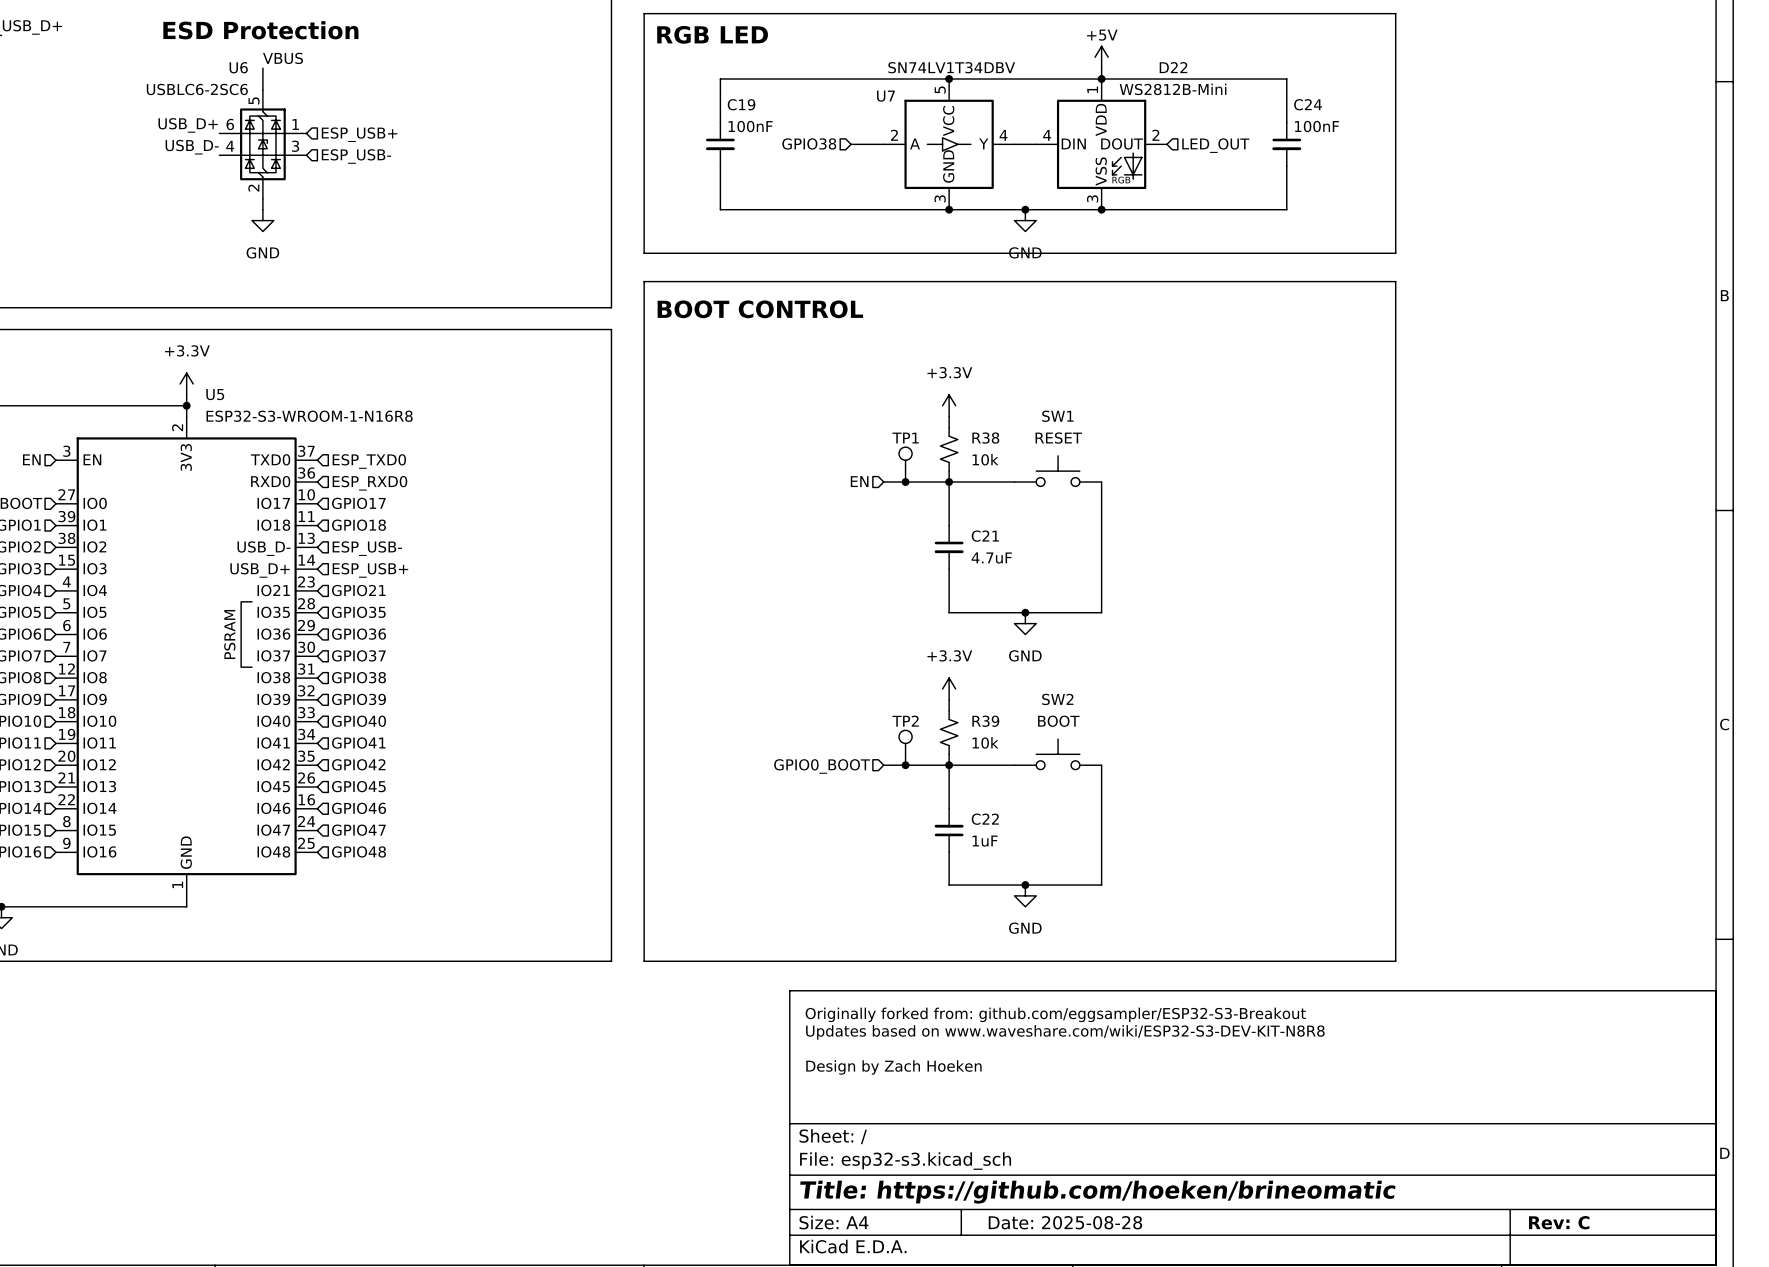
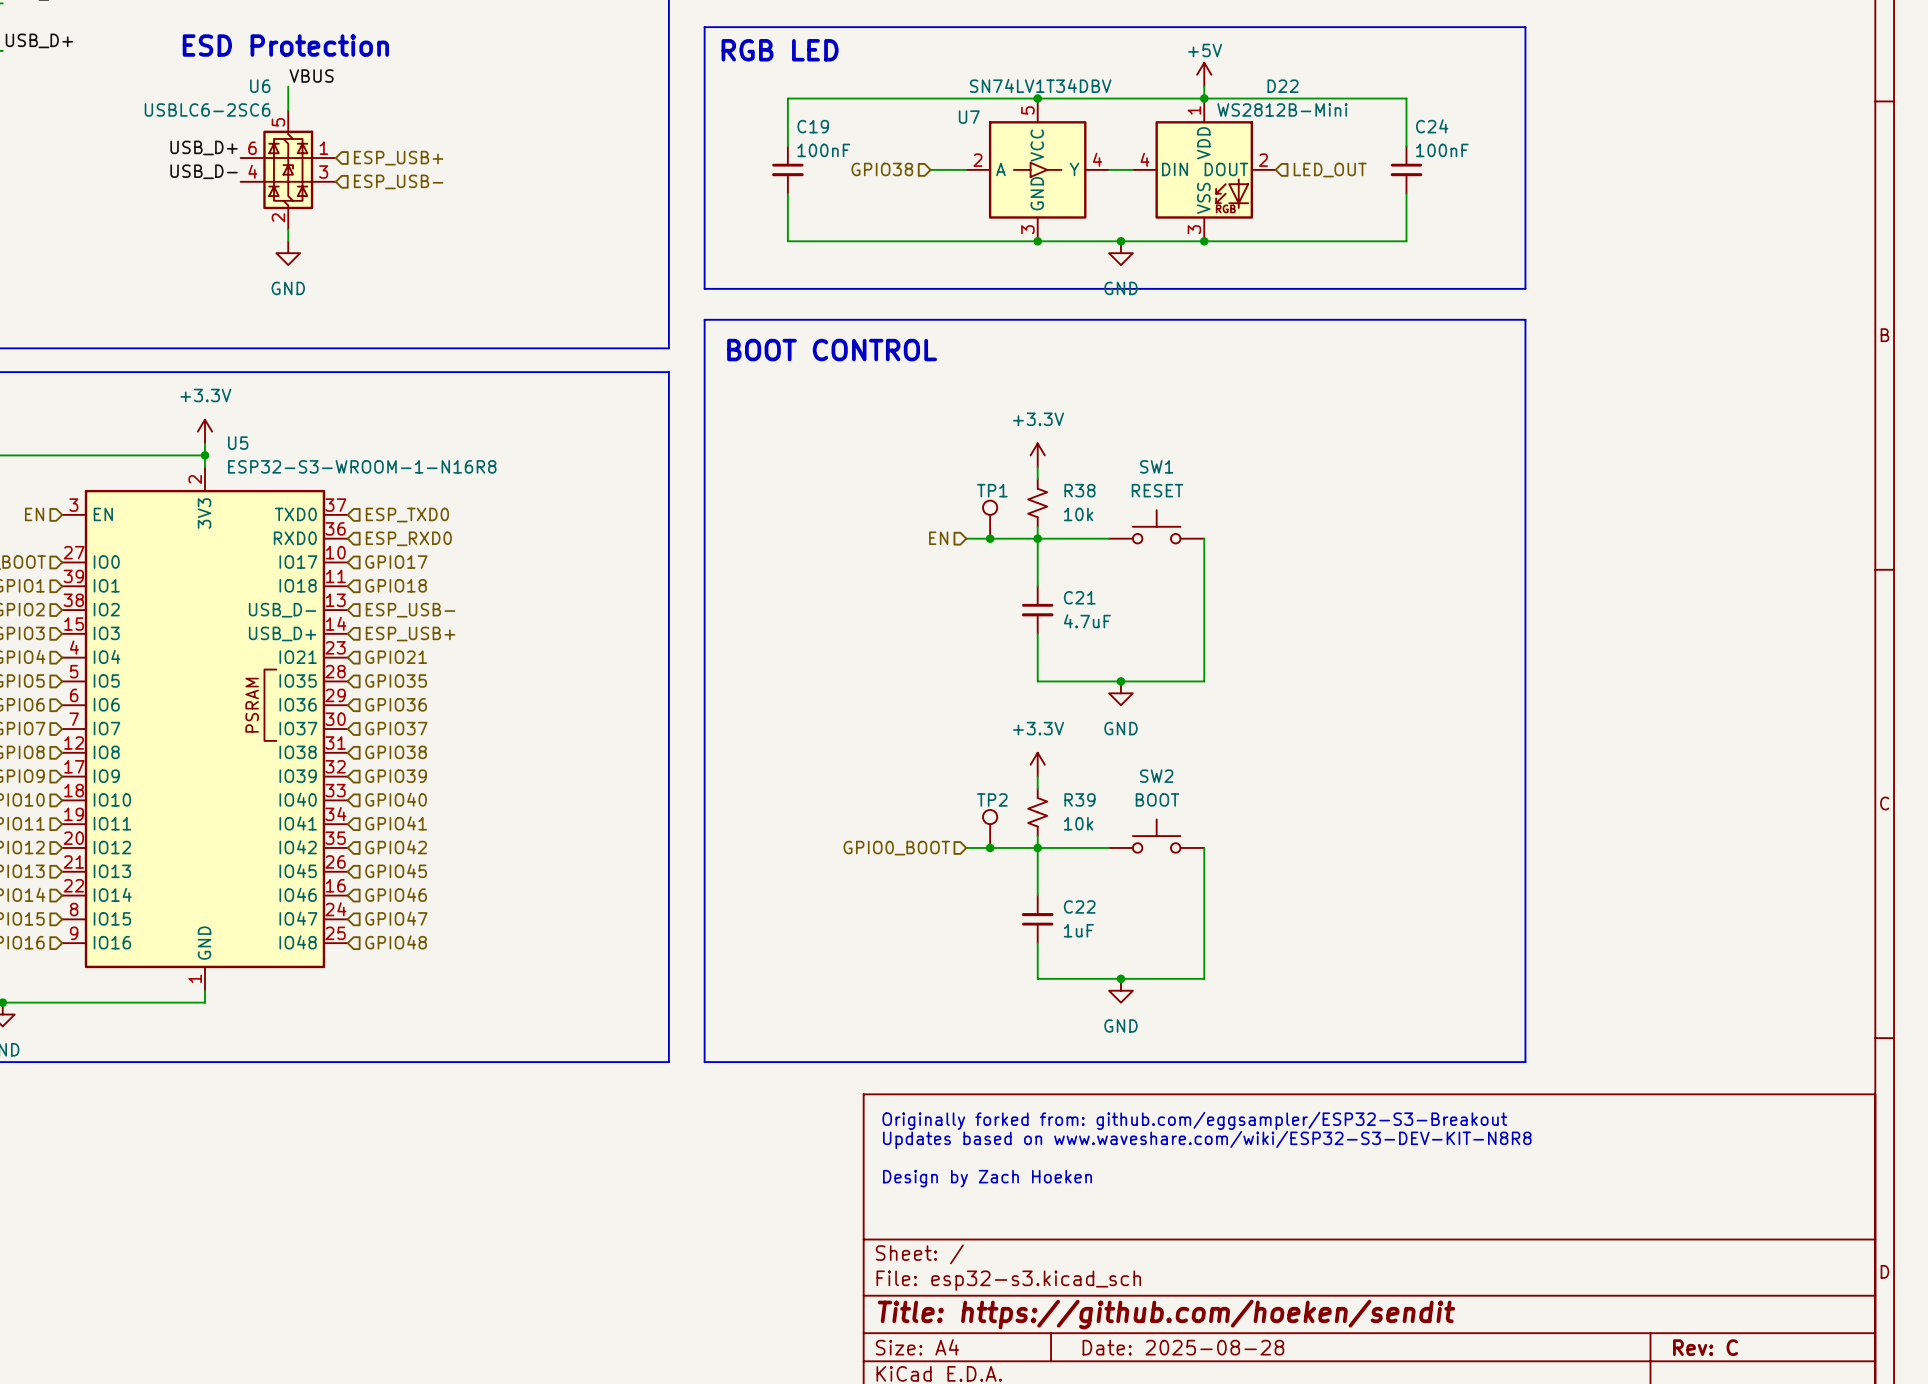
title block: Title: https://github.com/hoeken/brineomatic (1097, 1192) -> Title: https://github.com/hoeken/sendit (1166, 1314)

